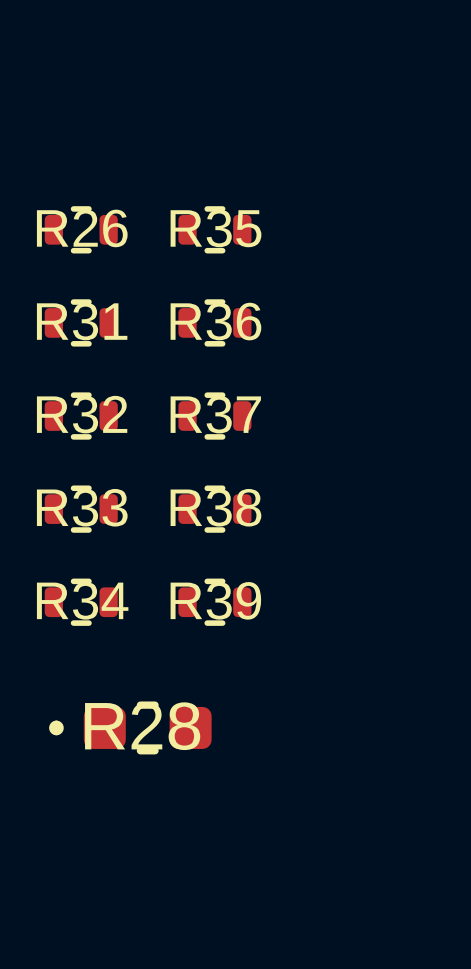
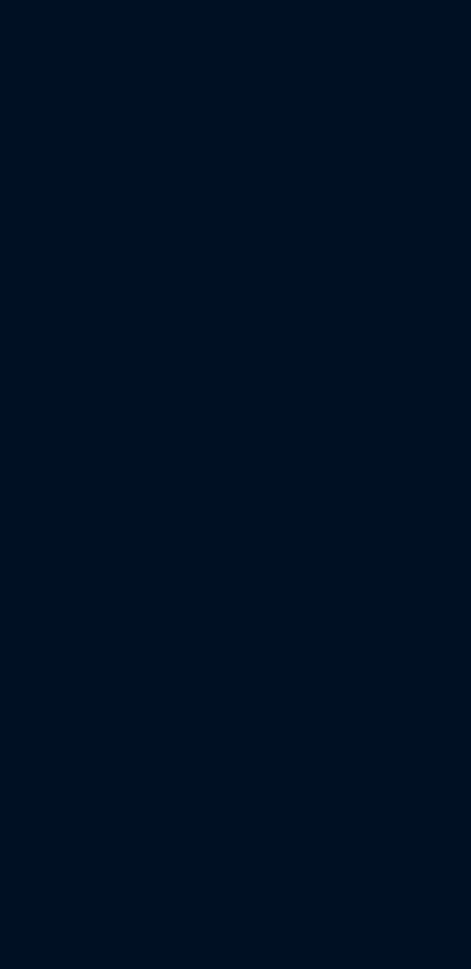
R26: (81, 229) -> none
R35: (214, 229) -> none
R31: (81, 322) -> none
R36: (214, 322) -> none
R32: (81, 416) -> none
R37: (214, 416) -> none
R33: (81, 509) -> none
R38: (214, 509) -> none
R34: (81, 602) -> none
R39: (214, 602) -> none
R28: (130, 727) -> none

